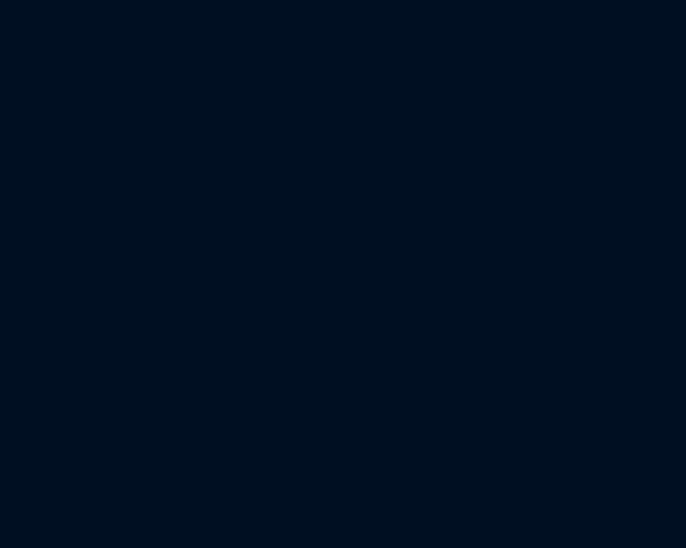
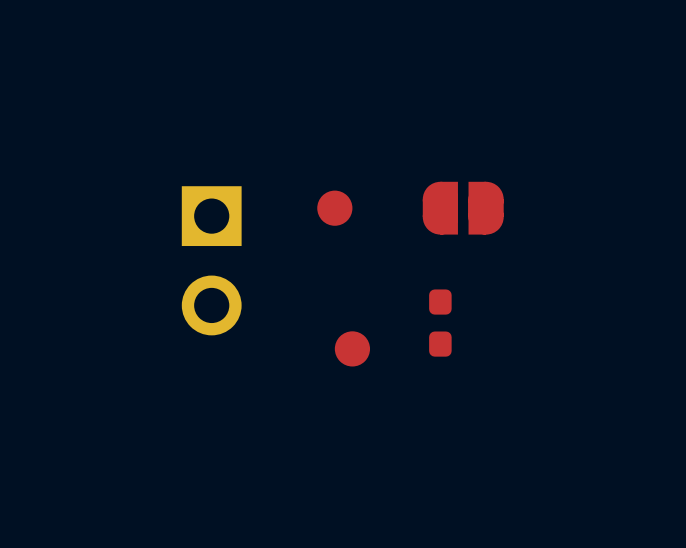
part: none -> (334, 208)
part: none -> (463, 208)
part: none -> (211, 260)
part: none -> (440, 323)
part: none -> (352, 348)

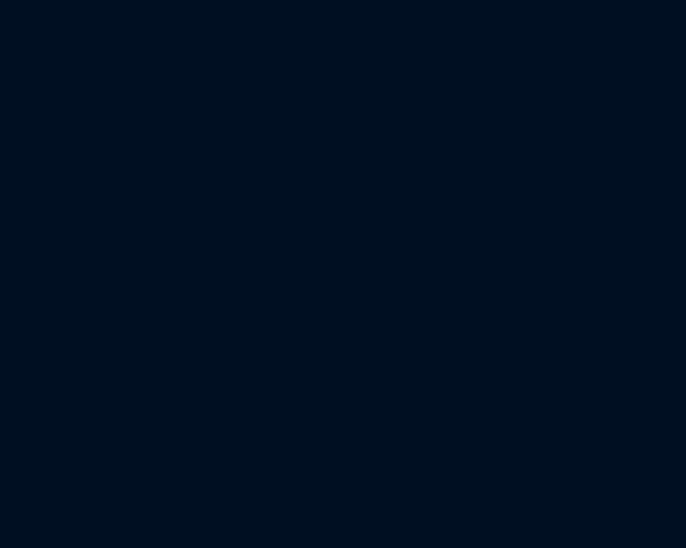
part: (334, 208) -> none
part: (463, 208) -> none
part: (211, 260) -> none
part: (440, 323) -> none
part: (352, 348) -> none

